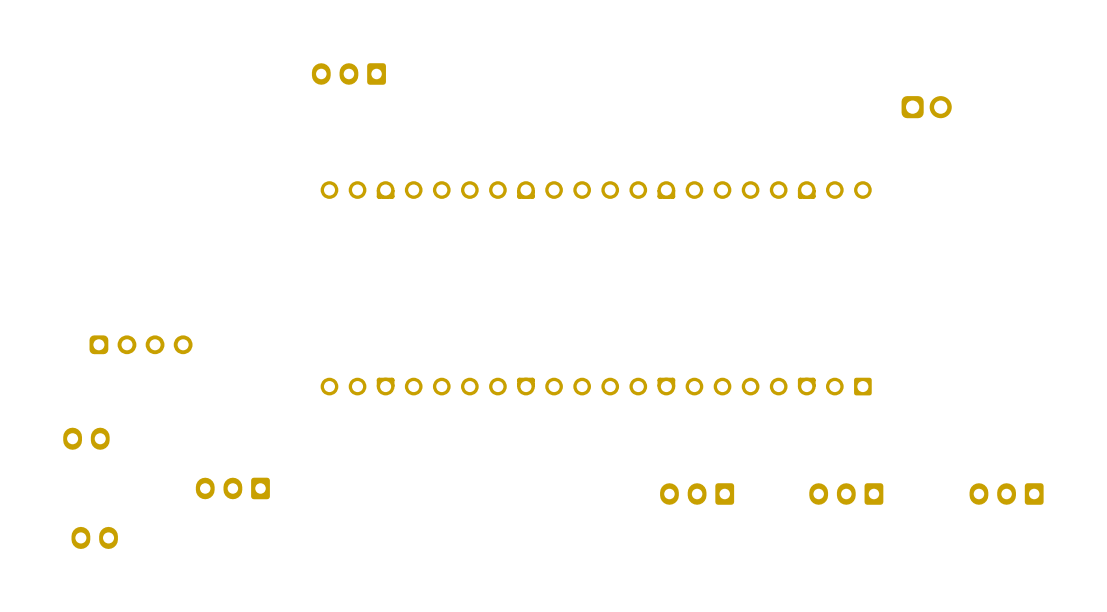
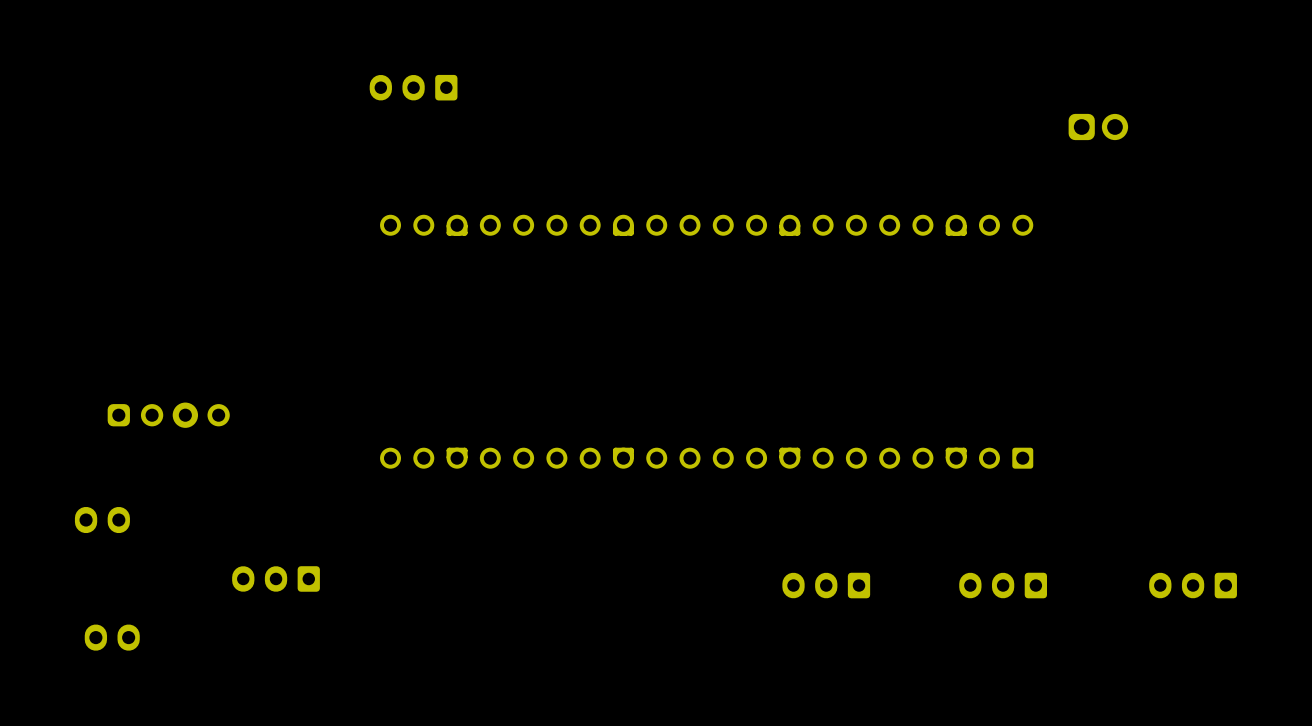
part footprint: [89, 335, 193, 355] -> [107, 402, 230, 428]

